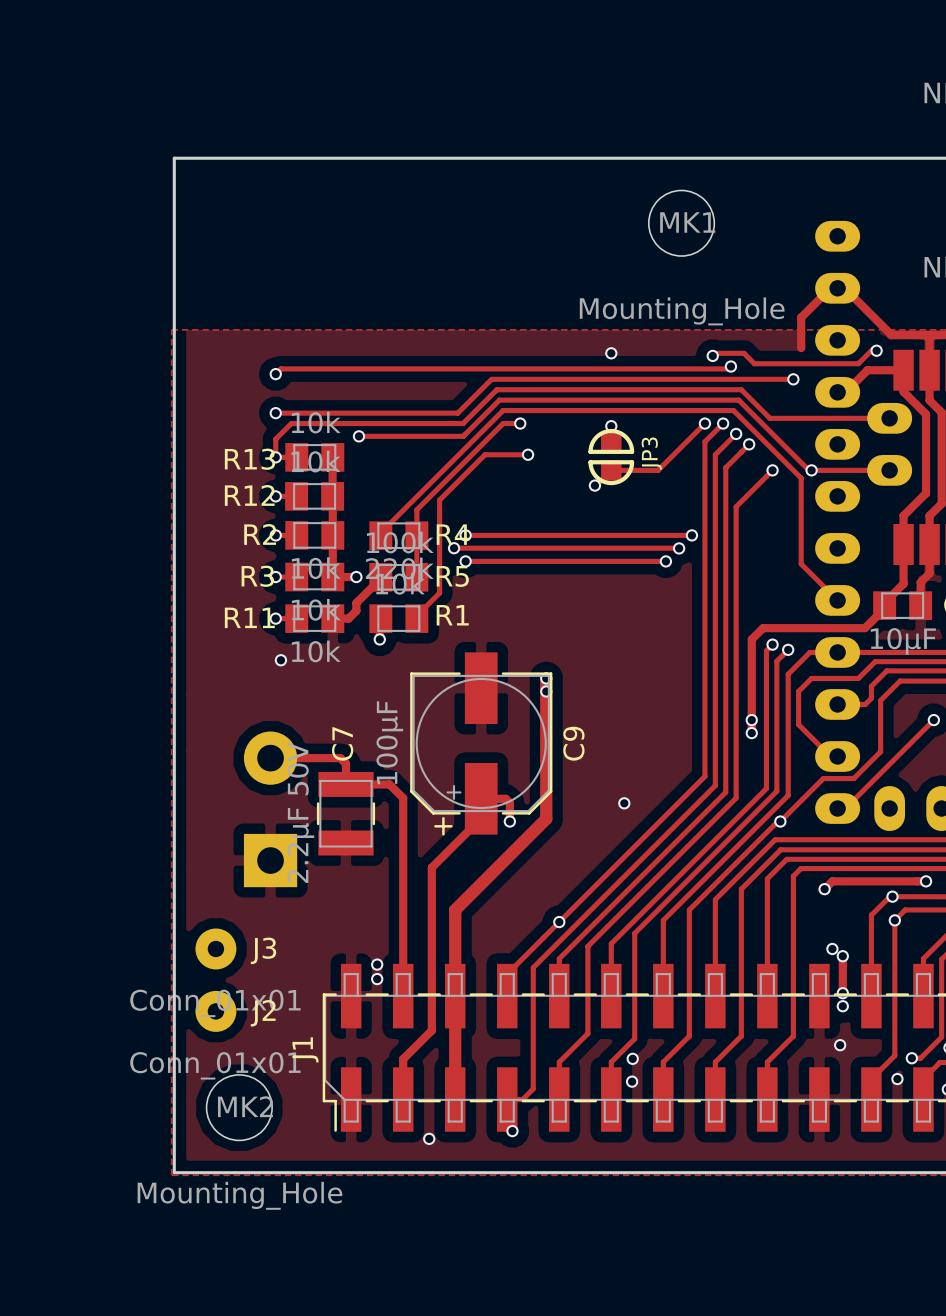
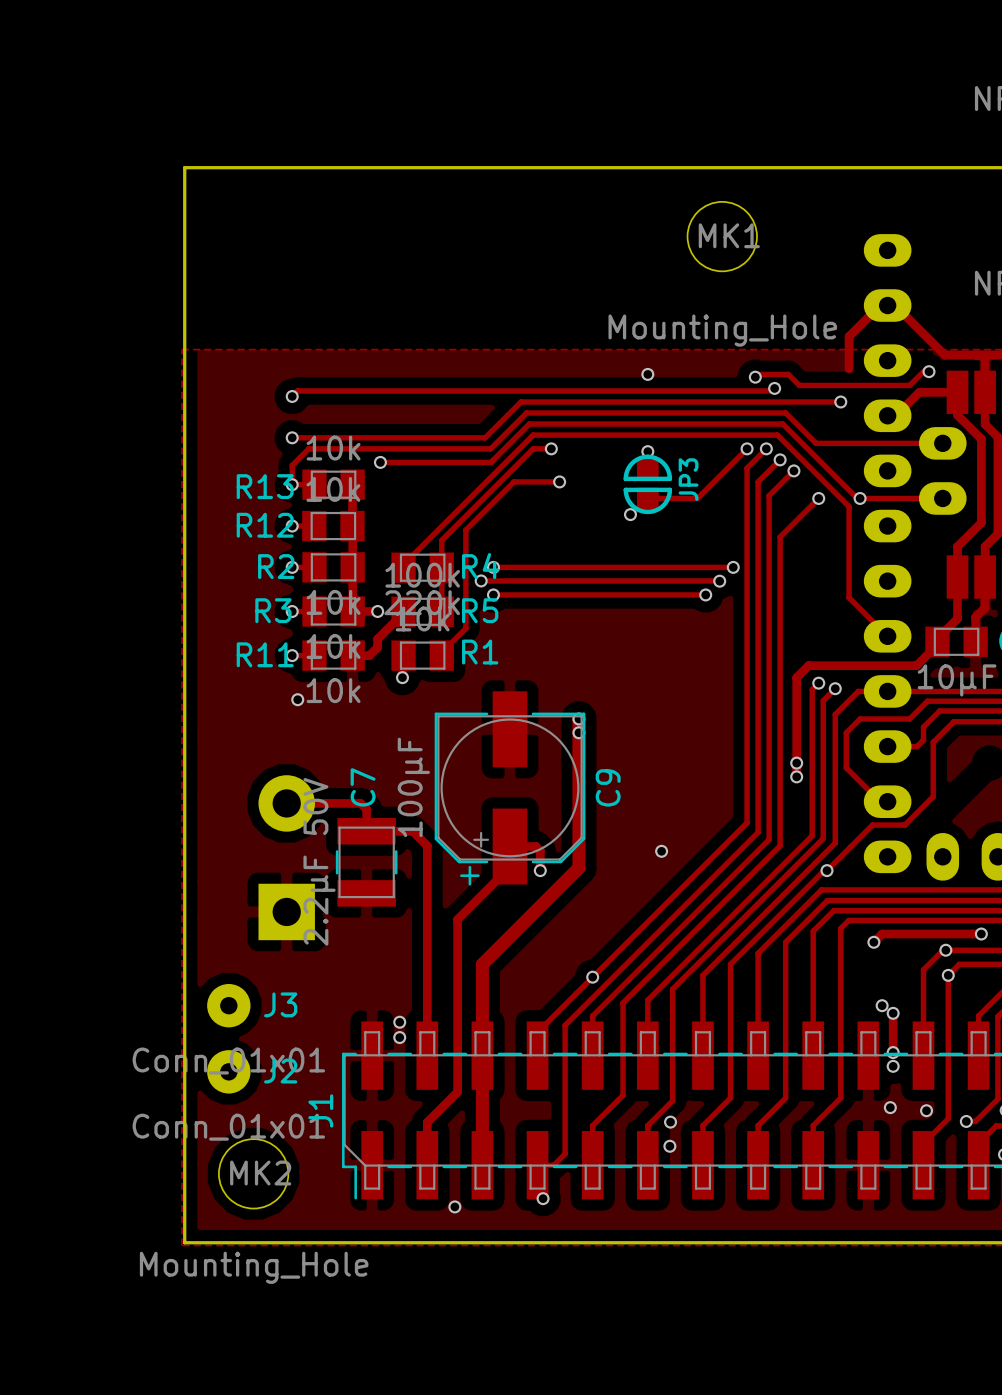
track: (933, 720) (844, 808) -> none
via: (933, 720) -> none
via position: (897, 1079) -> (926, 1110)

